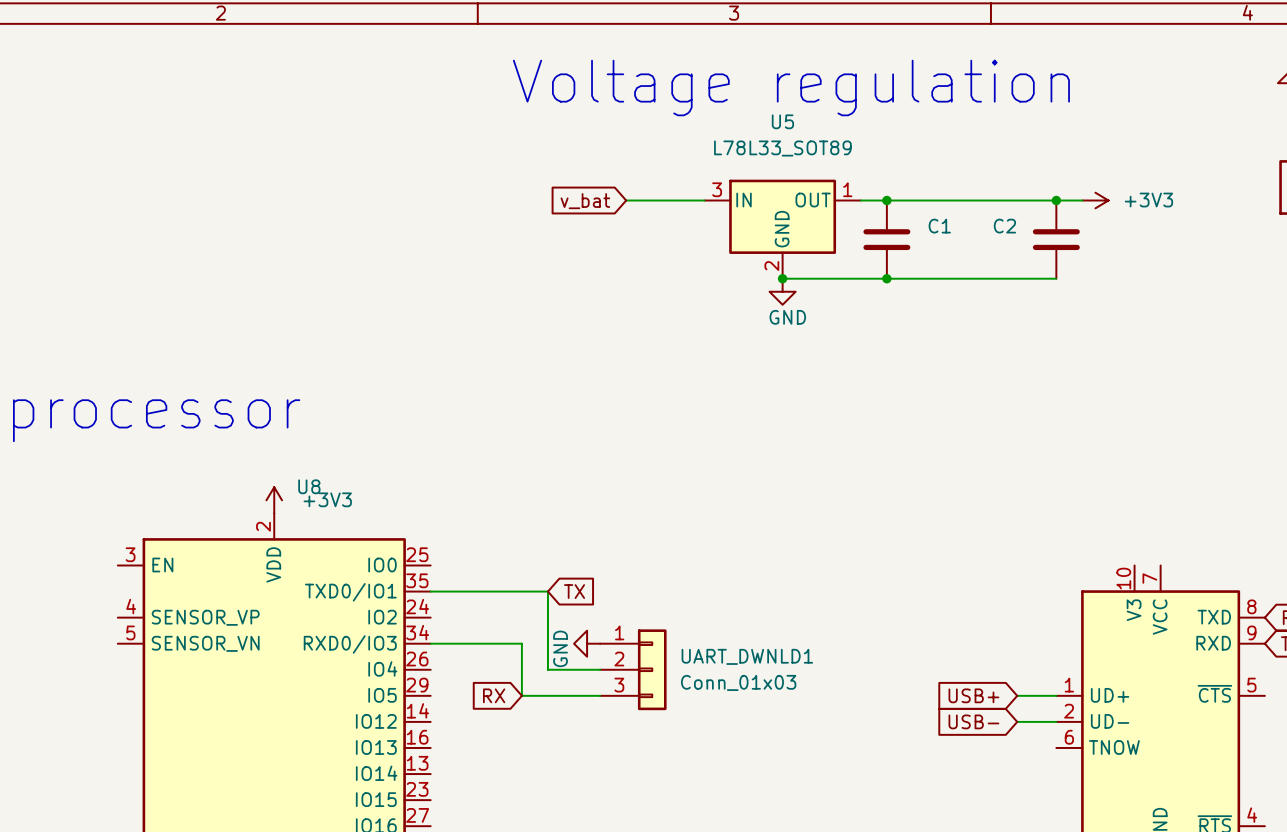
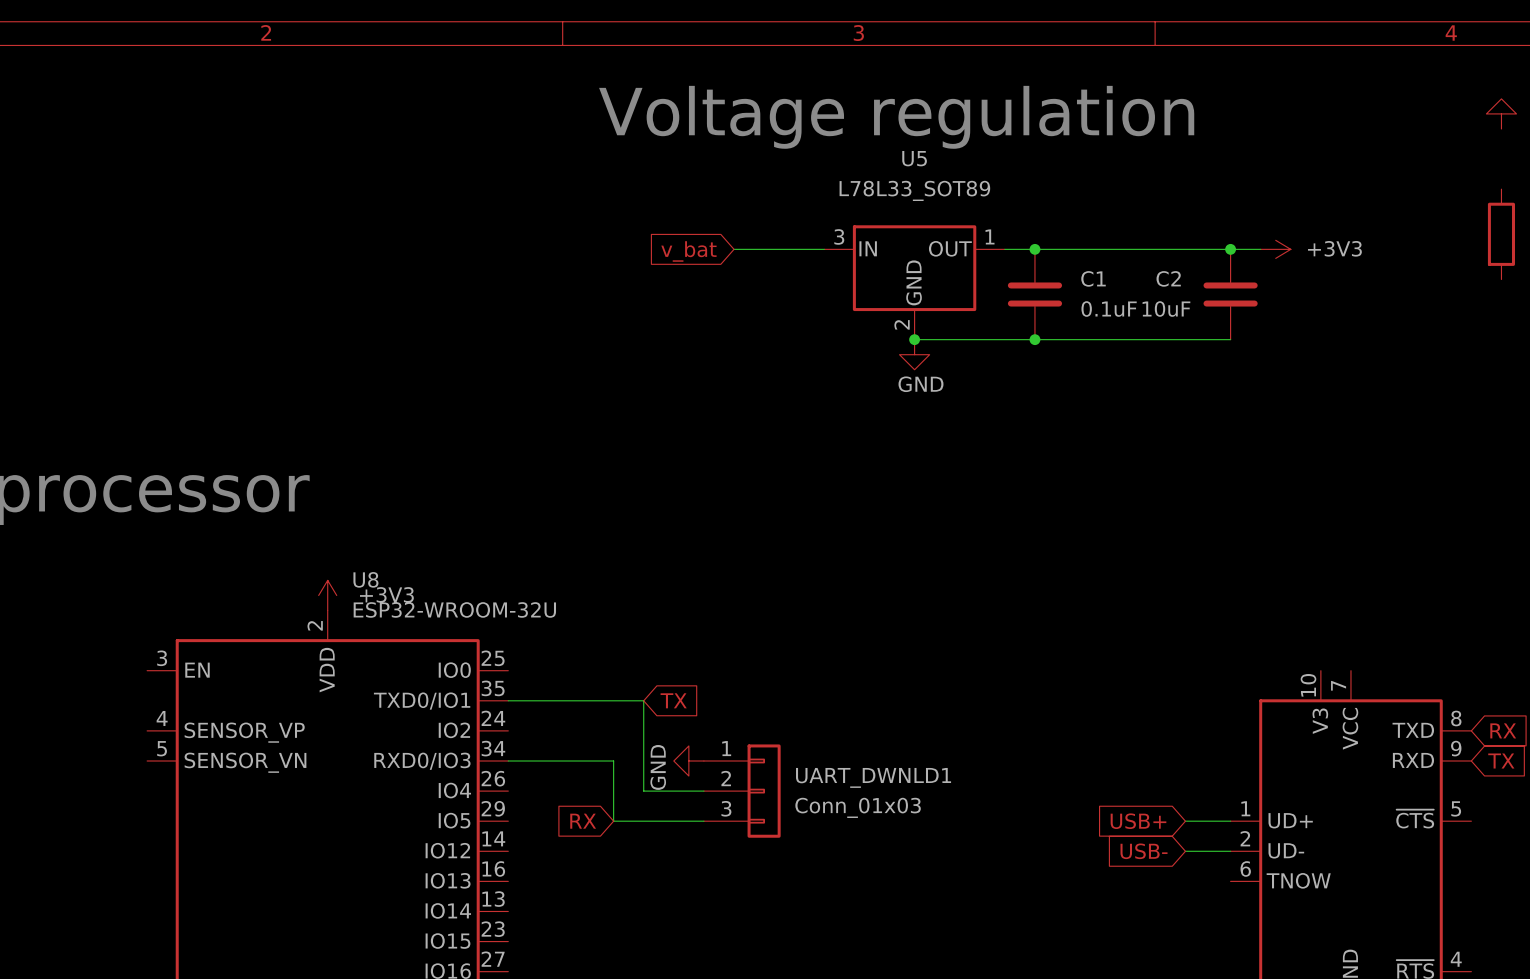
C1 value: none -> 0.1uF (1109, 309)
C2 value: none -> 10uF (1166, 309)
U8 value: none -> ESP32-WROOM-32U (454, 609)

